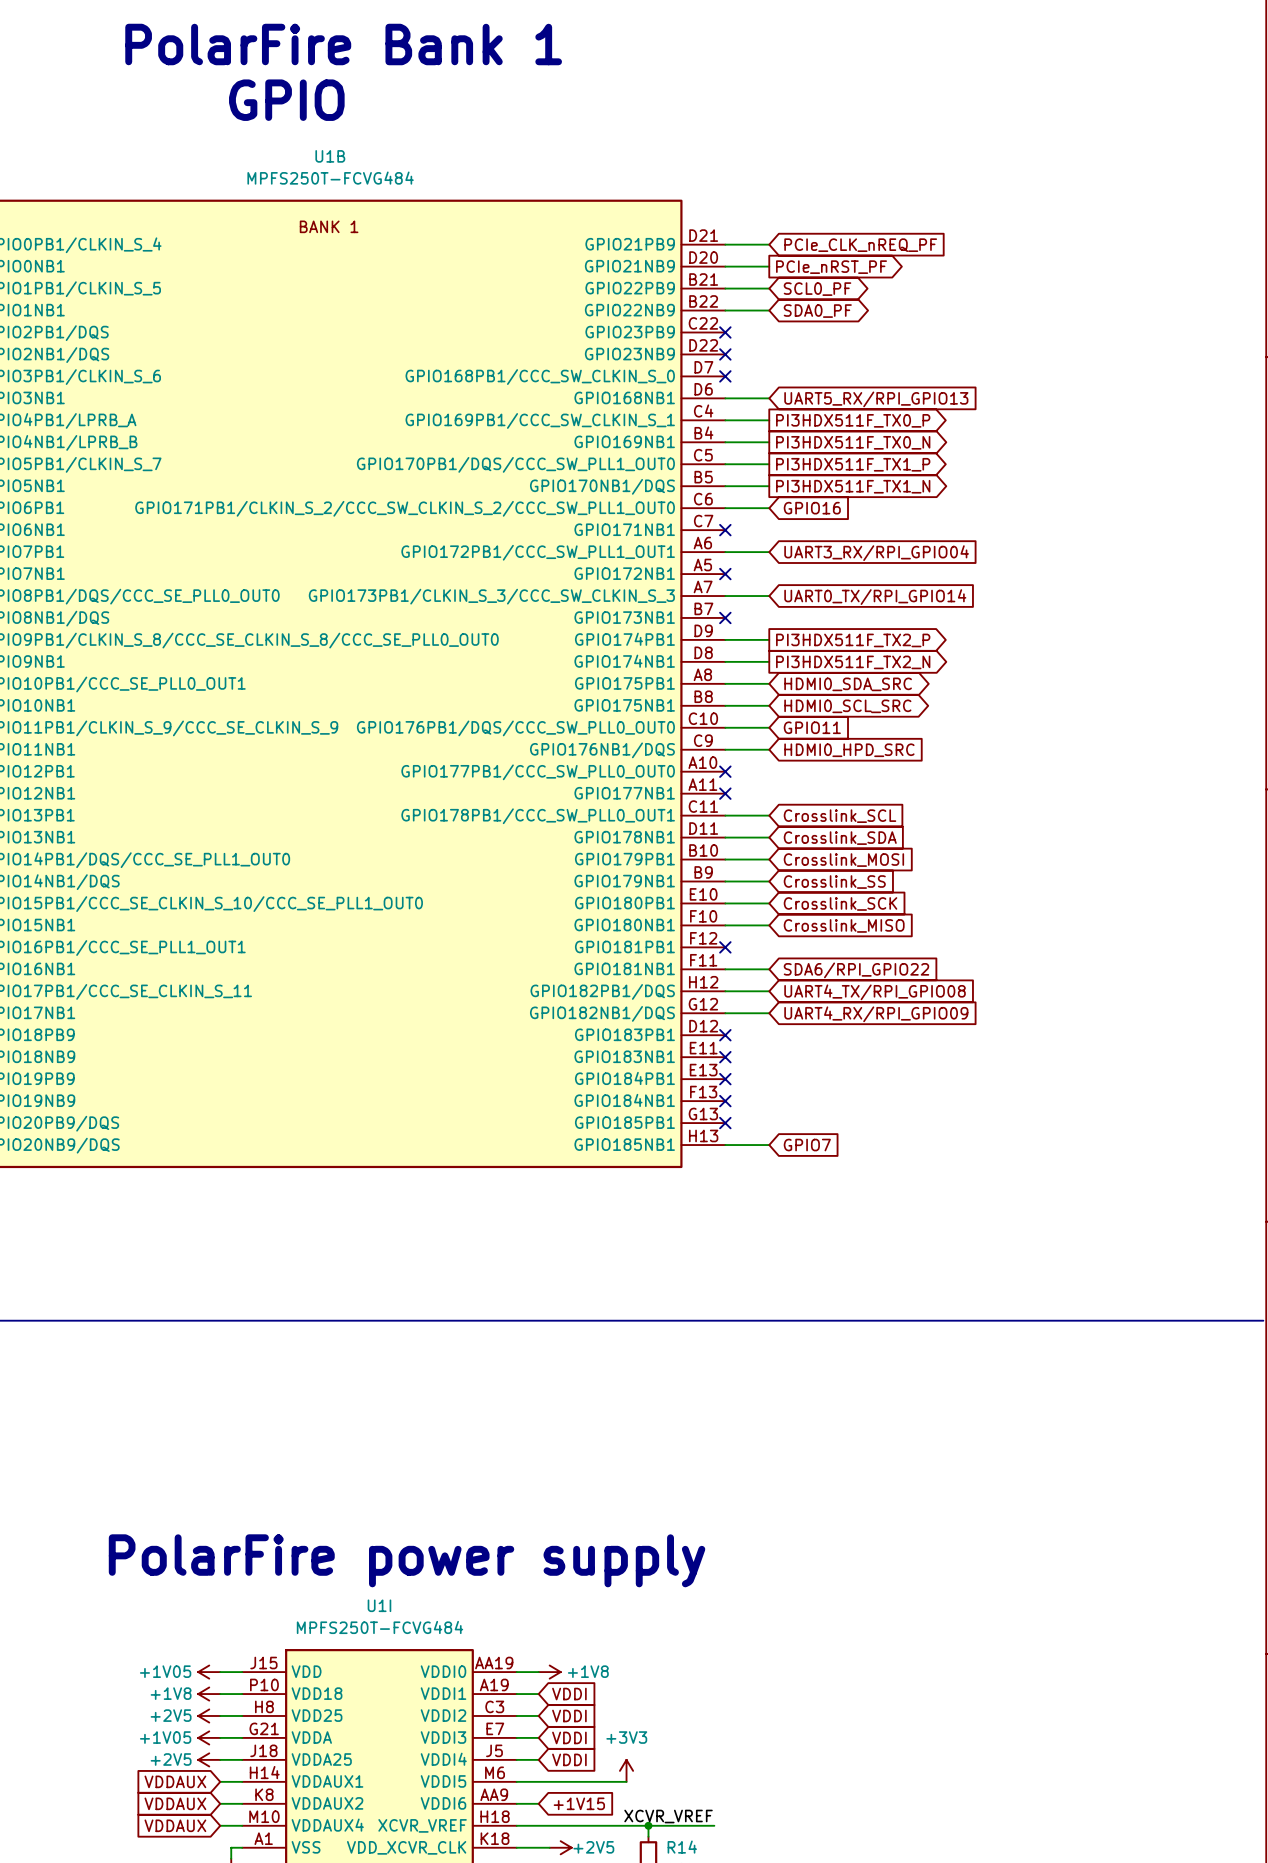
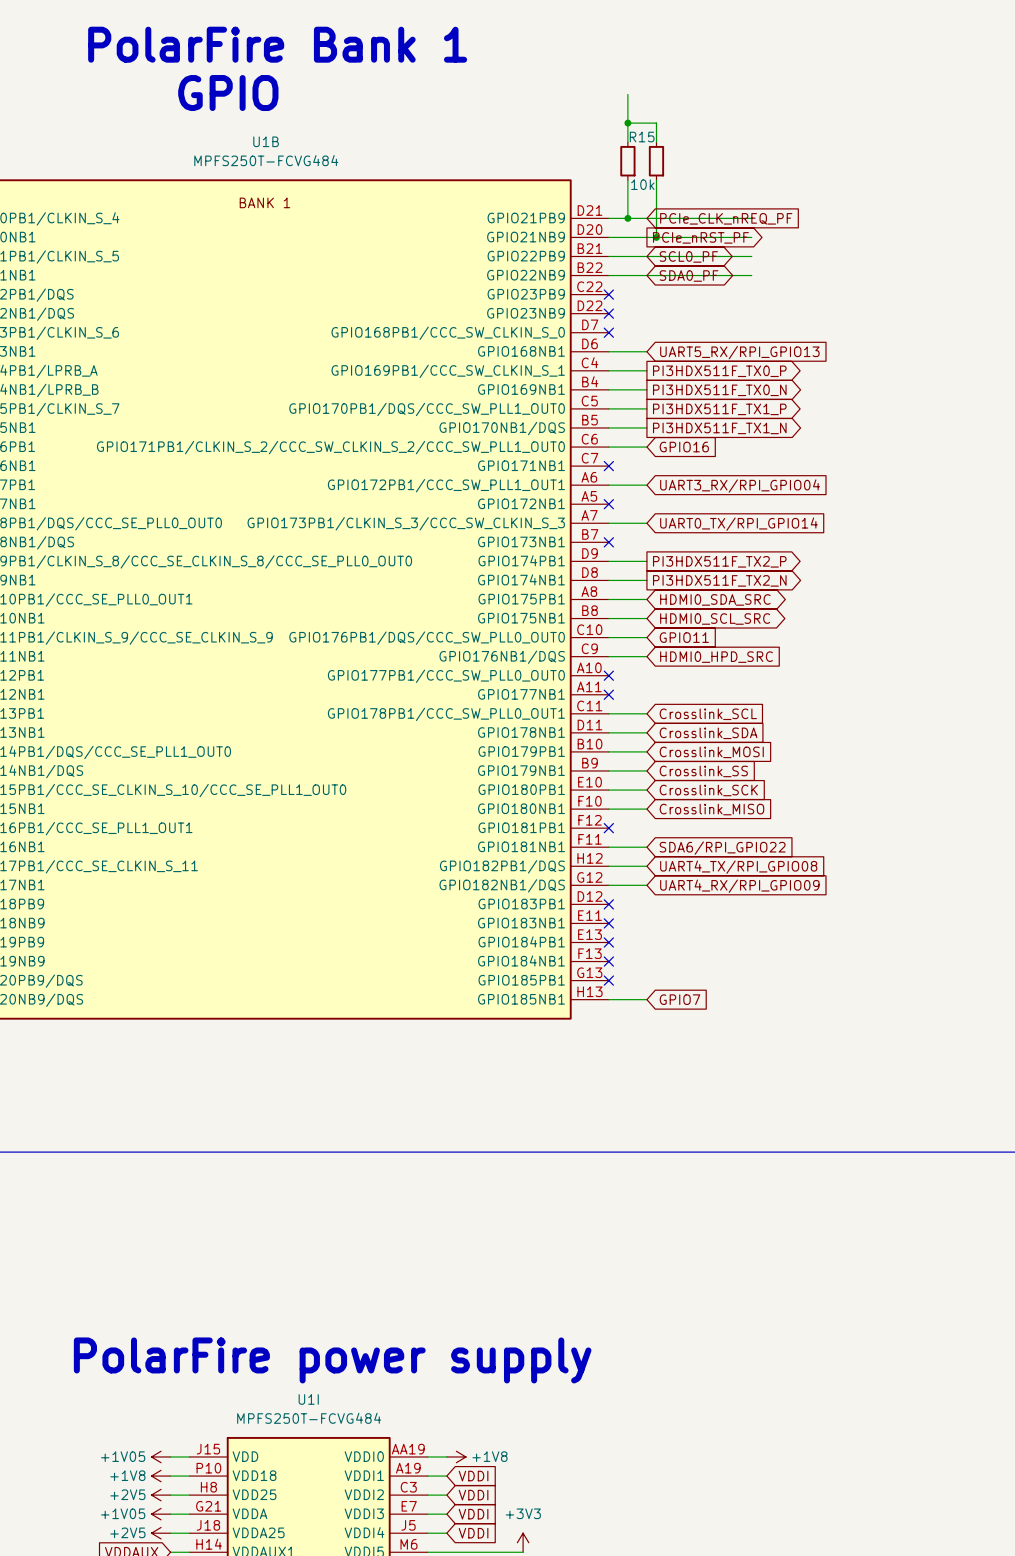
wire: none -> (627, 94) (627, 142)
wire: none -> (627, 123) (656, 123) (656, 142)
junction: none -> (627, 123)
R15: none -> (627, 161)
part: none -> (656, 161)
wire: none -> (627, 180) (627, 218)
wire: none -> (656, 180) (656, 237)
junction: none -> (627, 218)
wire: none -> (646, 218) (751, 218)
wire: none -> (646, 237) (751, 237)
junction: none -> (656, 237)
wire: none -> (646, 256) (751, 256)
wire: none -> (646, 275) (751, 275)

